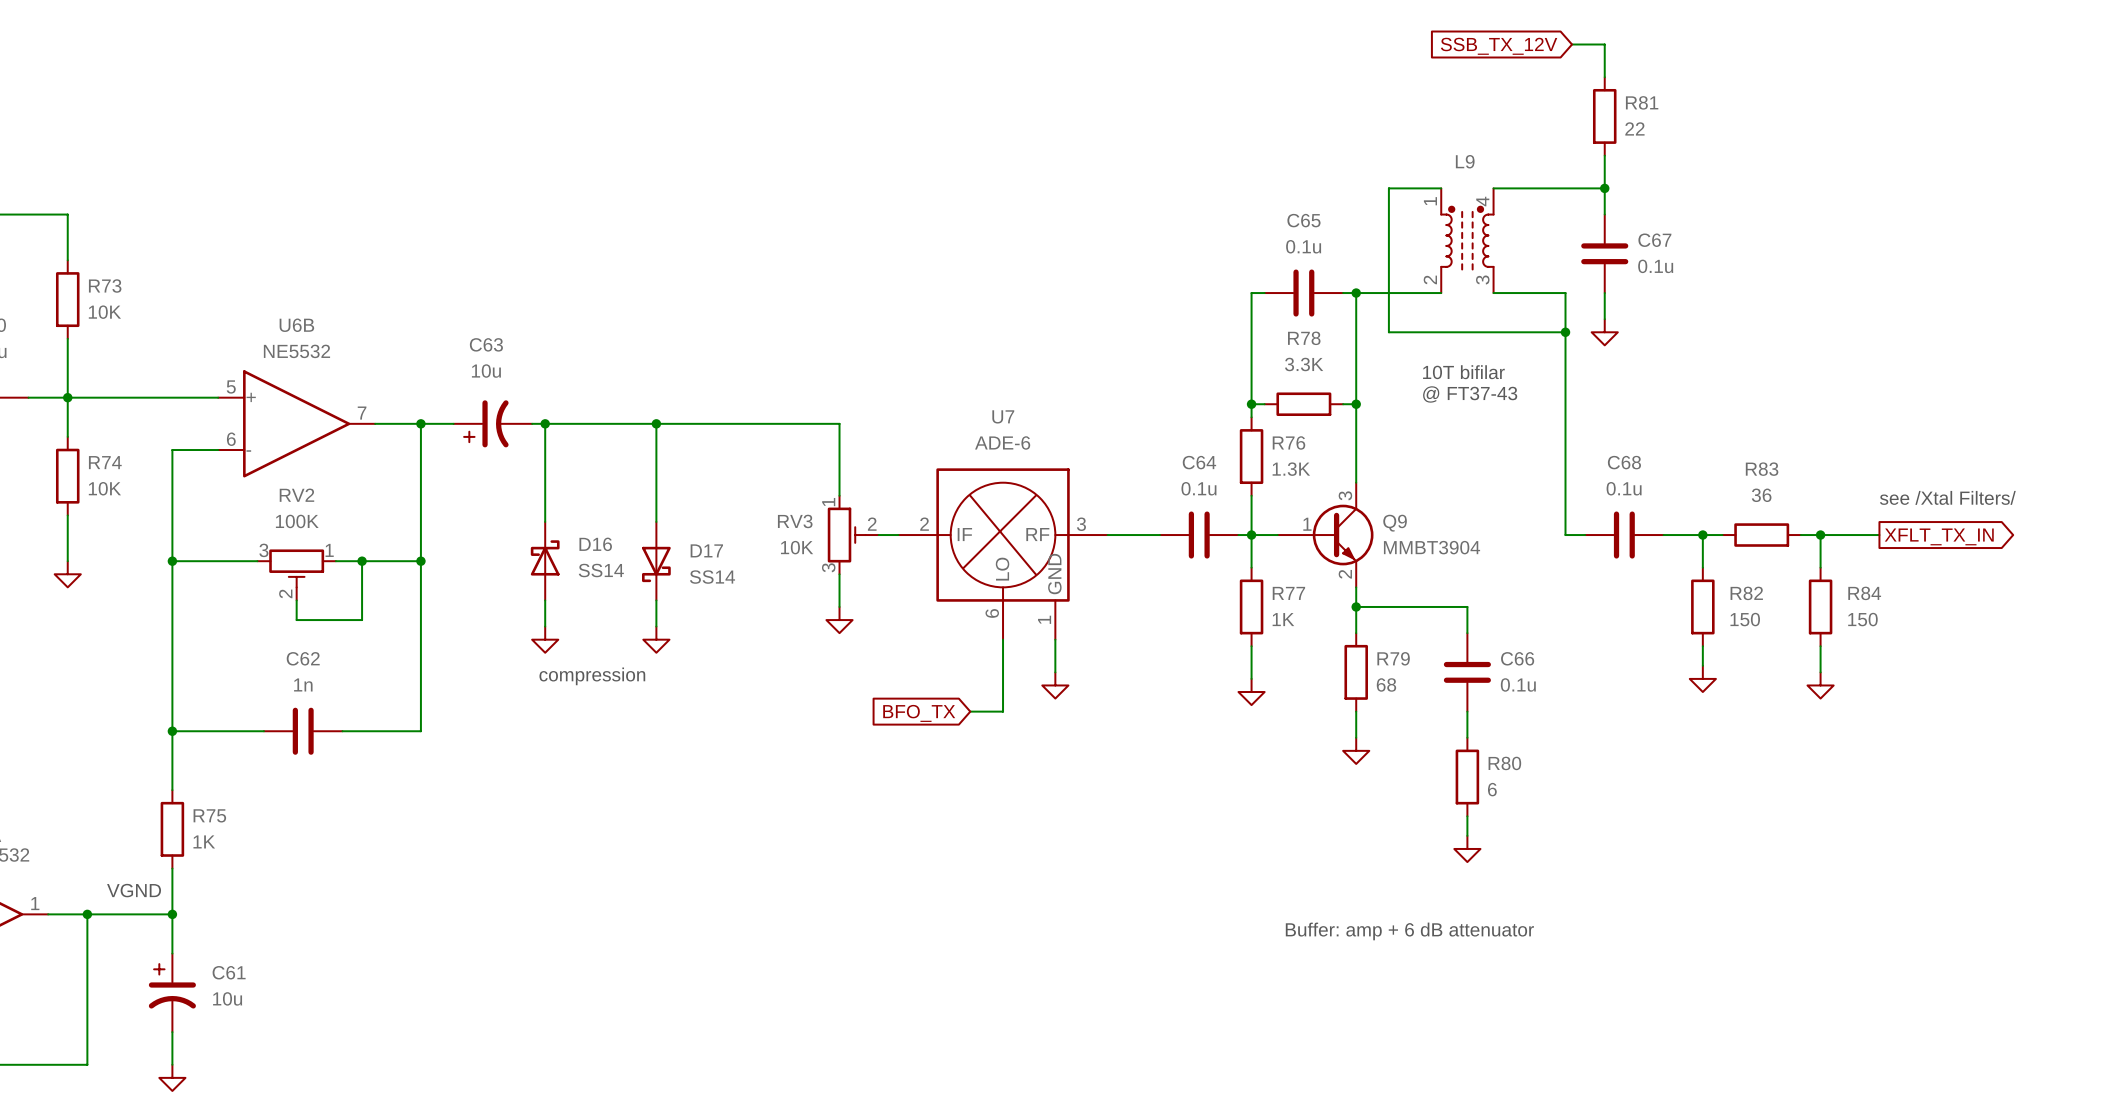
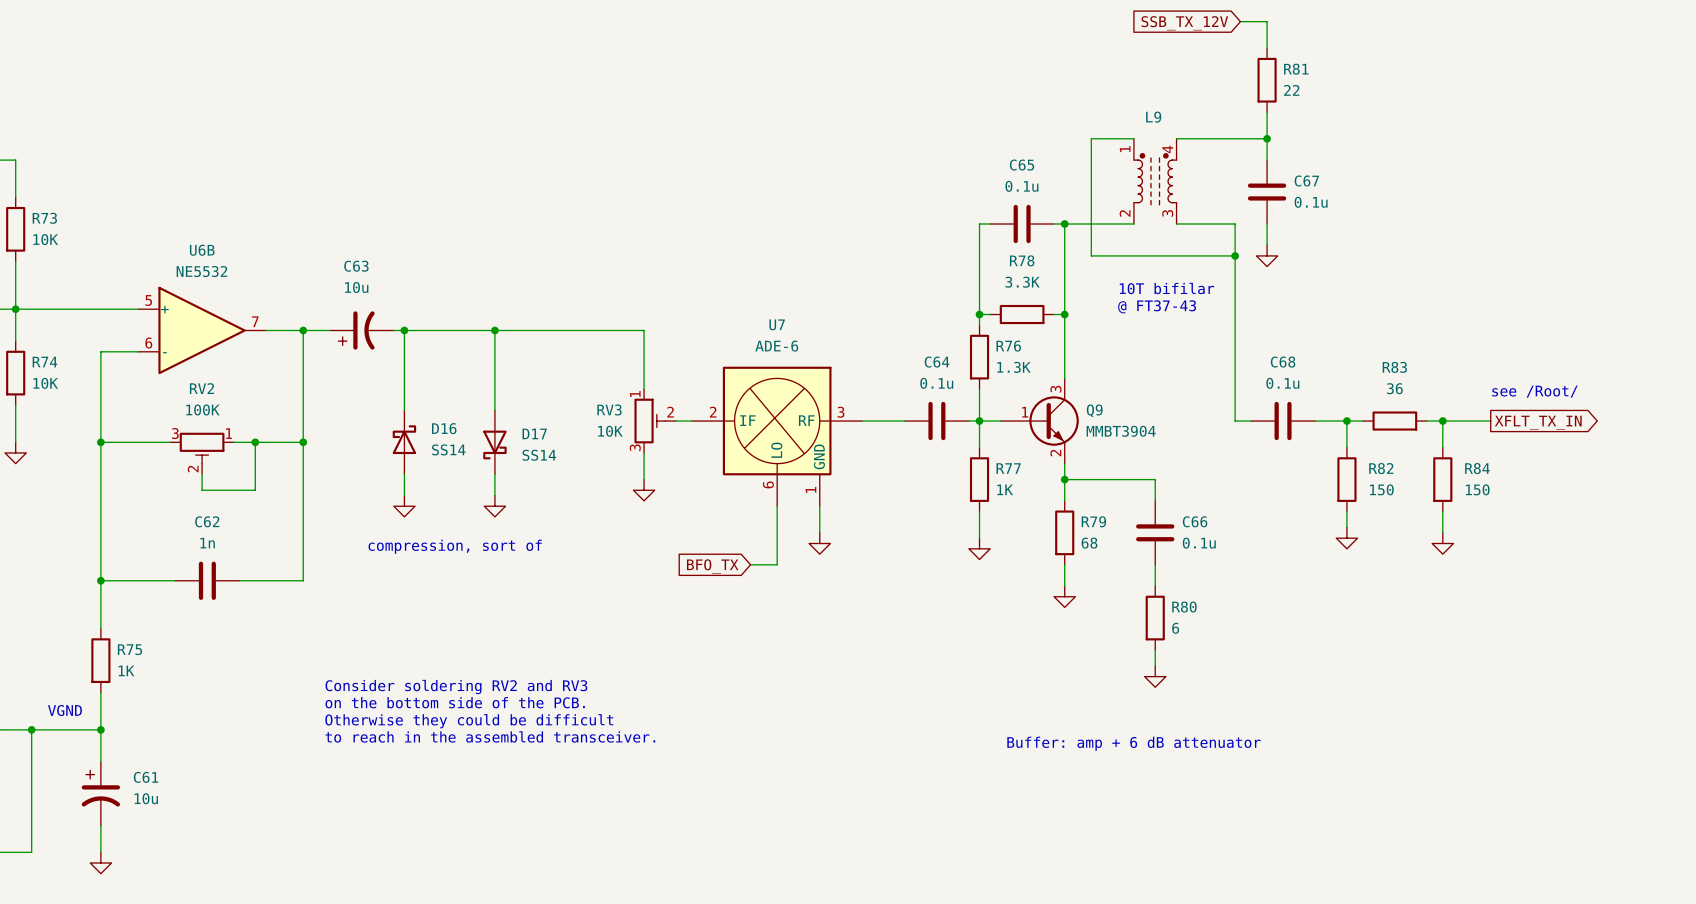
text: see /Xtal Filters/ (1947, 497) -> see /Root/ (1534, 391)
text: compression (592, 676) -> compression, sort of (455, 546)
text: none -> Consider soldering RV2 and RV3 (456, 686)
text: none -> on the bottom side of the PCB. (455, 702)
text: none -> Otherwise they could be difficult (469, 721)
text: none -> to reach in the assembled transceiver. (490, 736)

